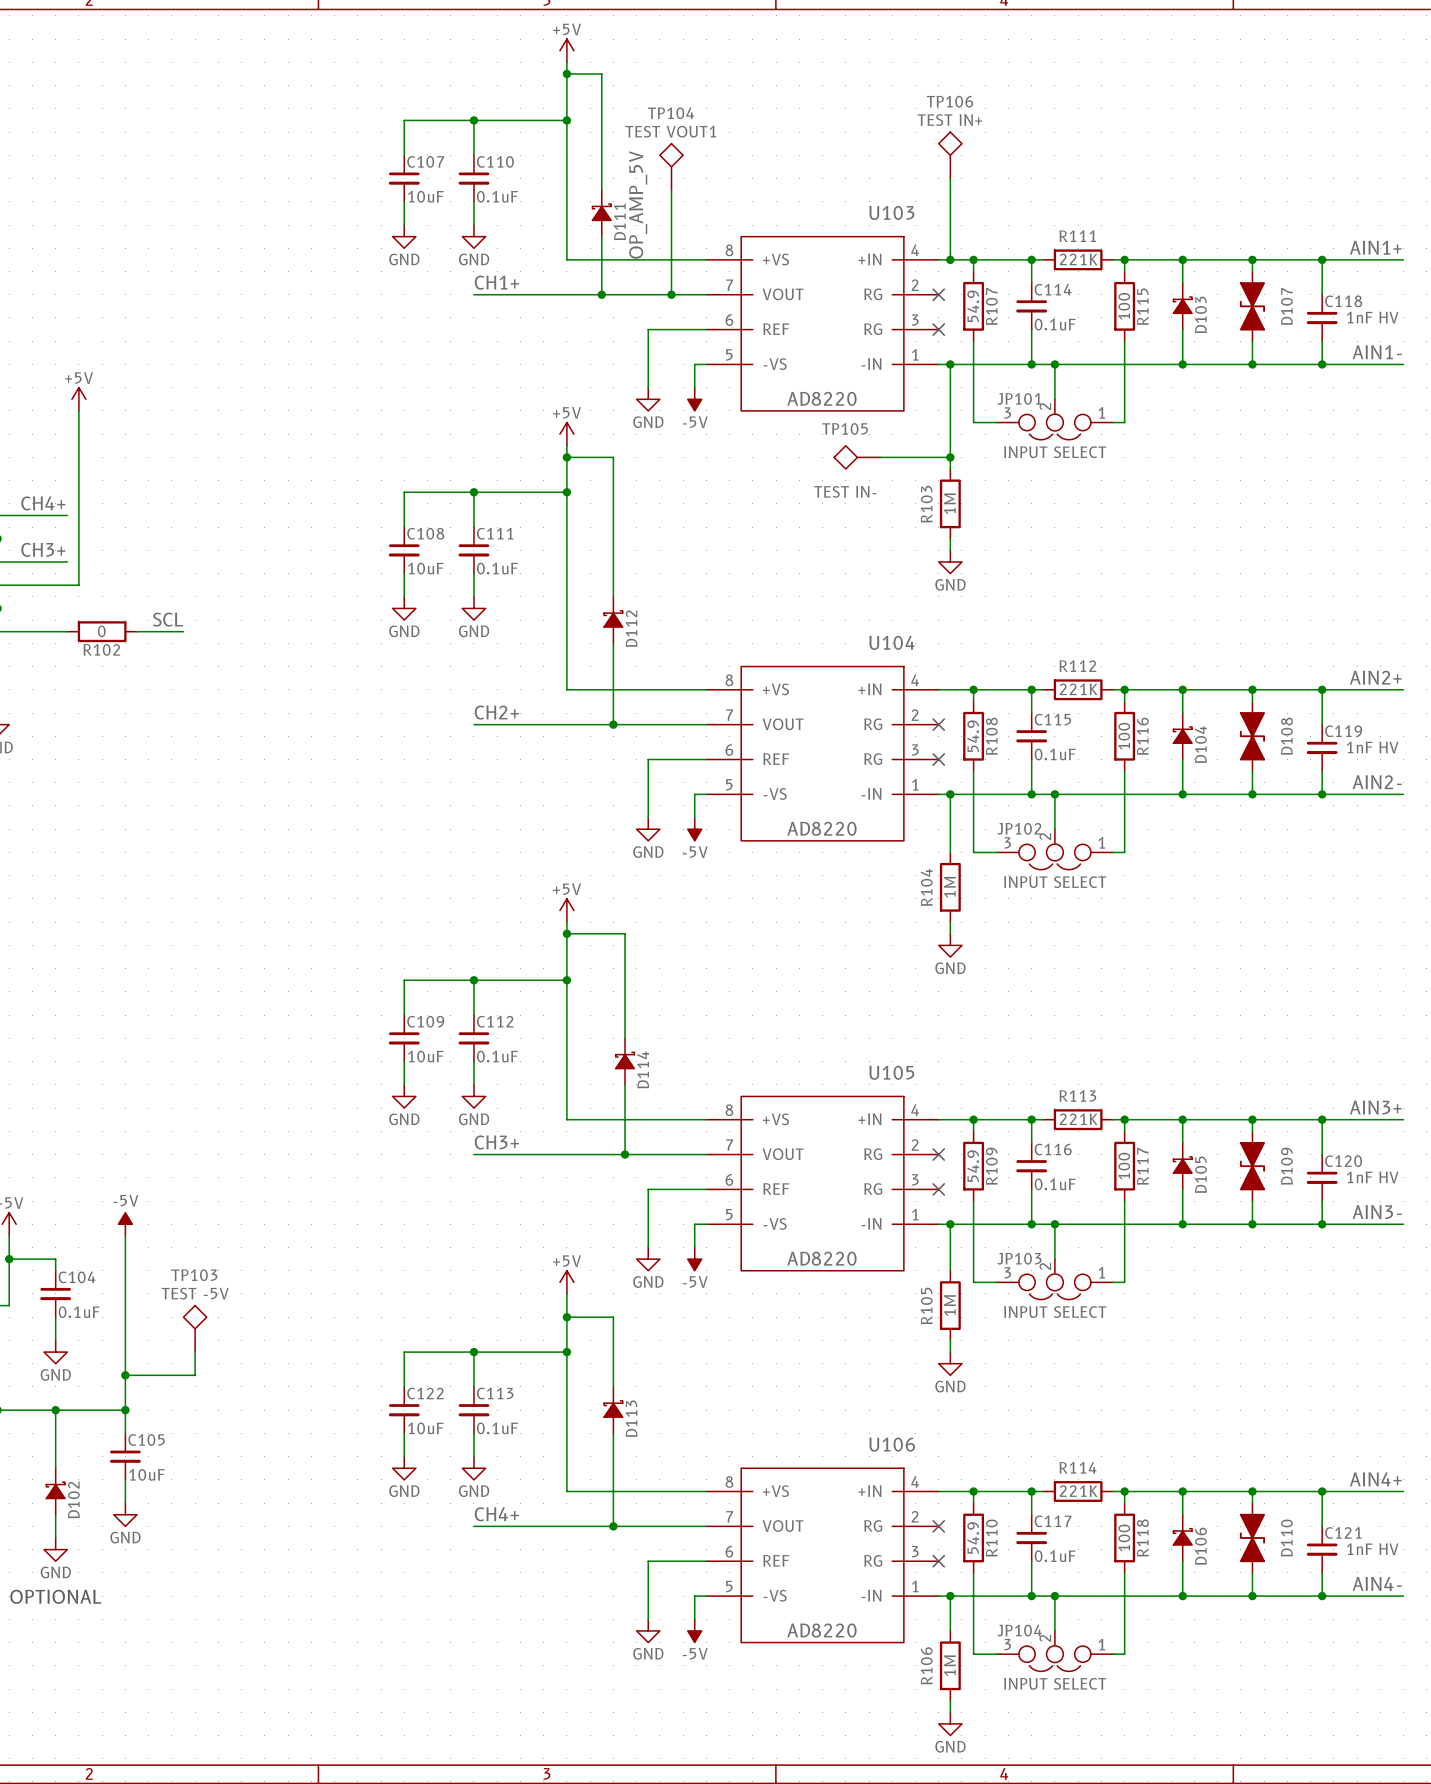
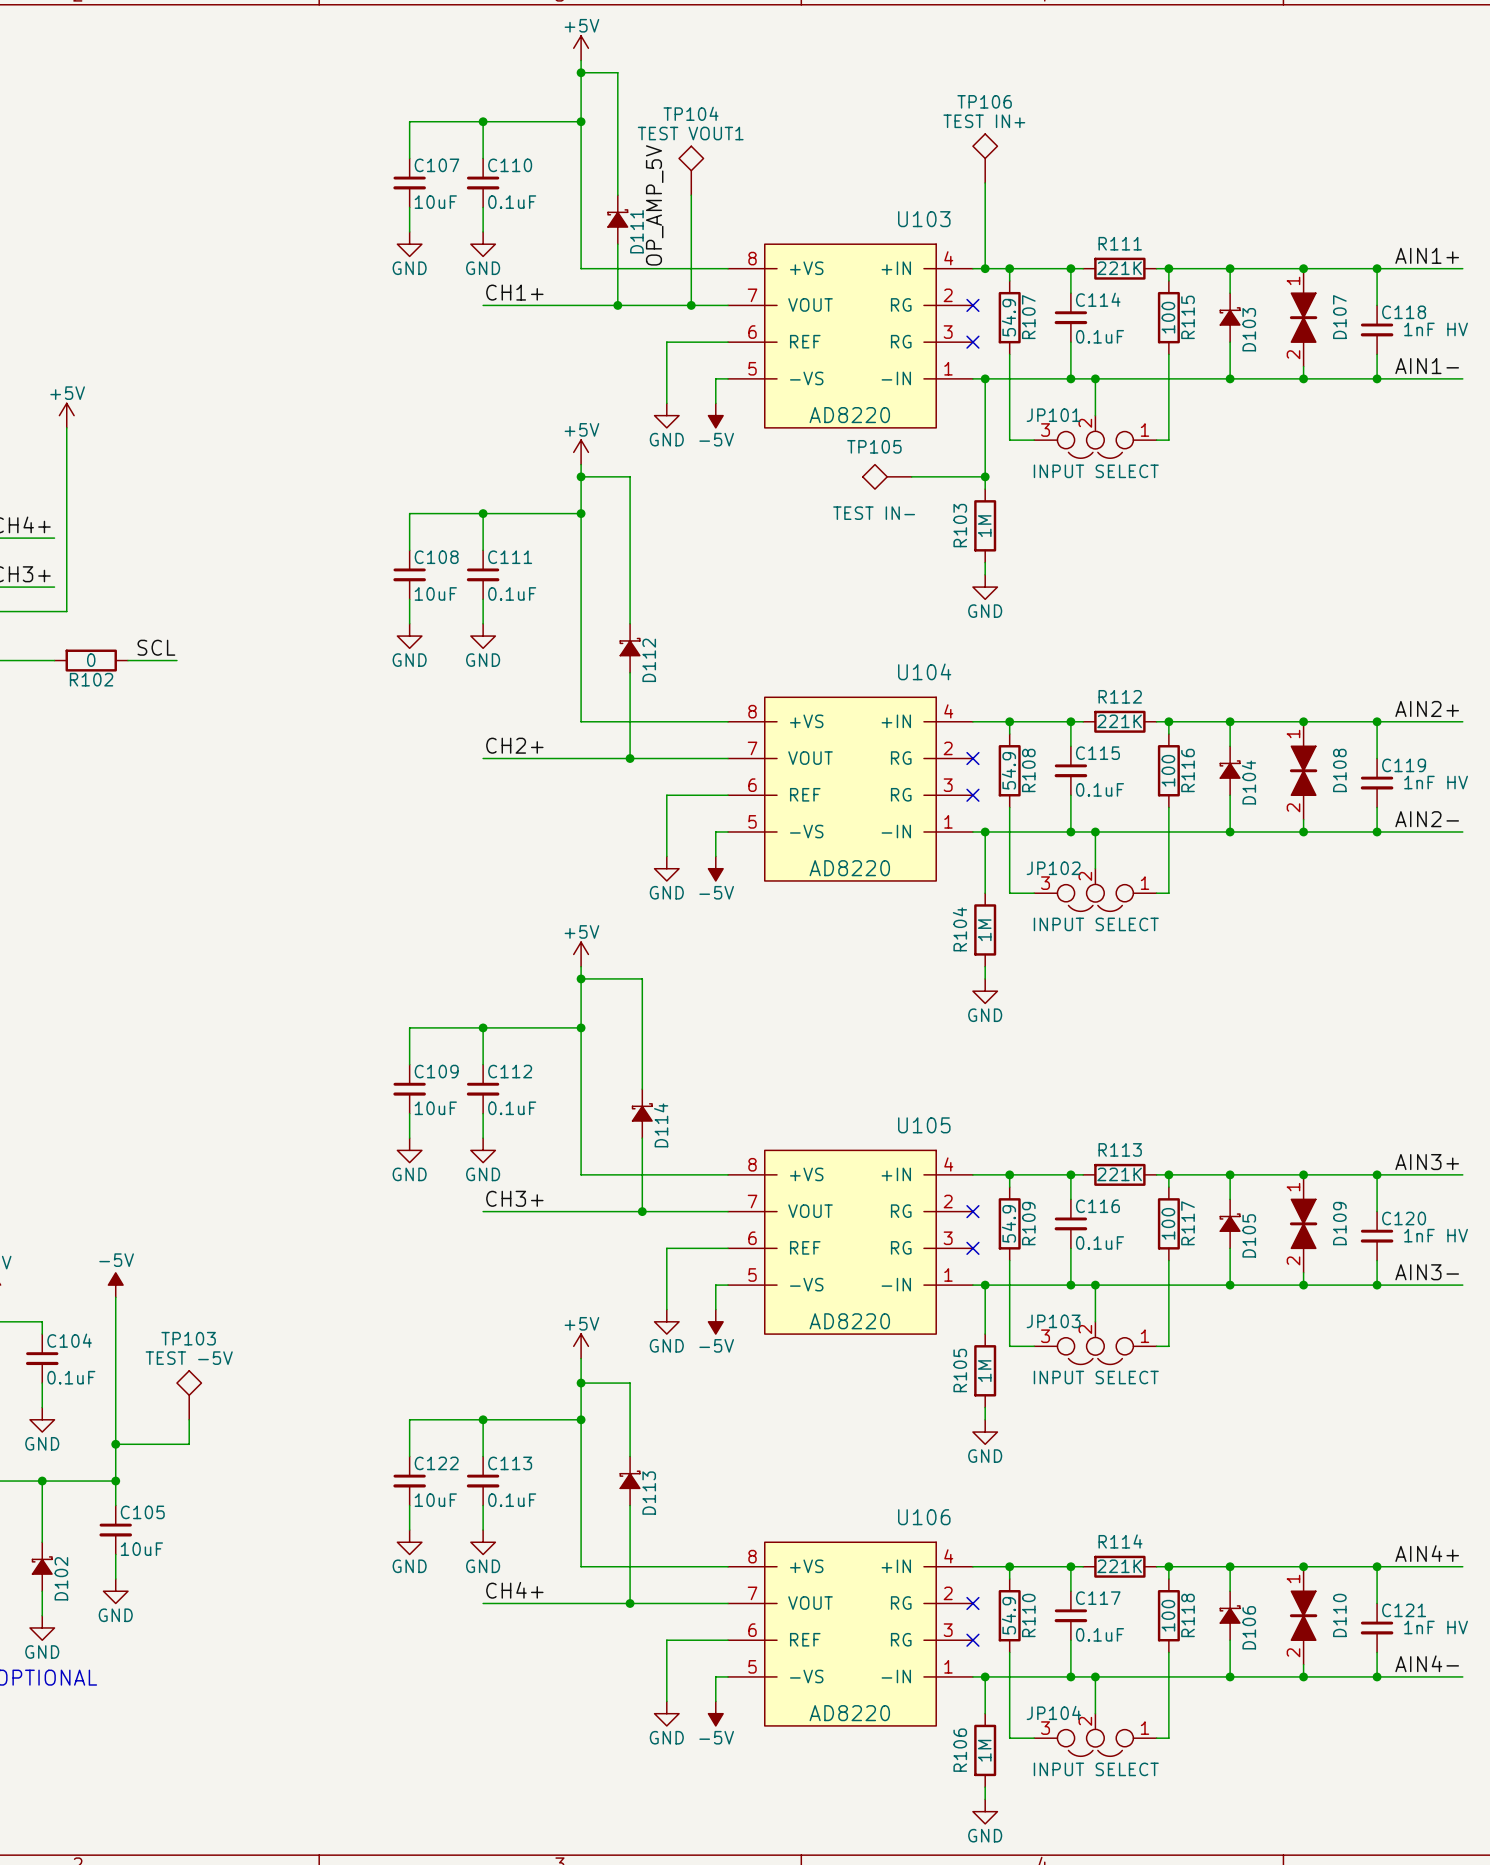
D107 symbol: [1239, 271, 1265, 342] -> [1289, 268, 1318, 367]
D108 symbol: [1239, 701, 1265, 772] -> [1289, 721, 1318, 820]
D109 symbol: [1239, 1131, 1265, 1202] -> [1289, 1174, 1318, 1273]
D110 symbol: [1239, 1503, 1265, 1573] -> [1289, 1566, 1318, 1665]

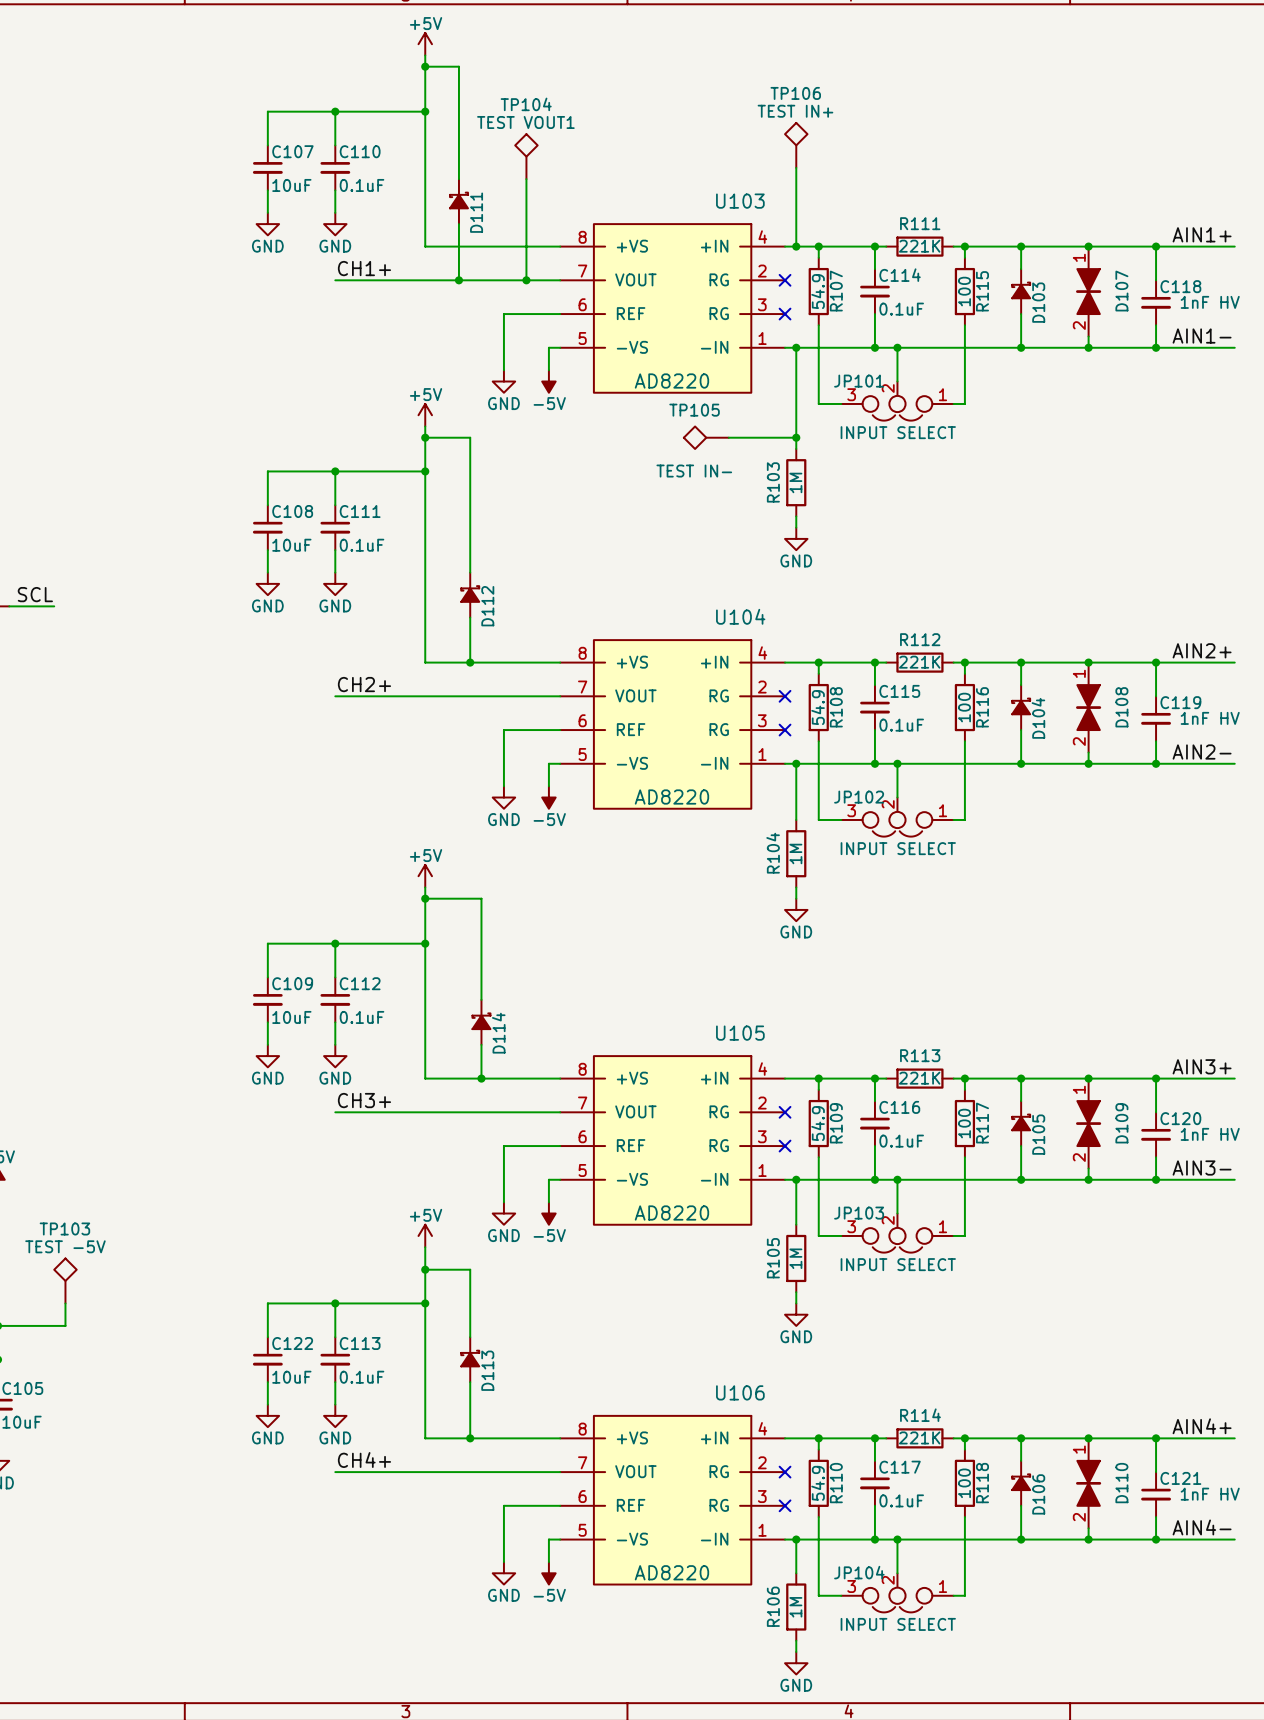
label: OP_AMP_5V (654, 205) -> none
wire: (630, 721) (630, 758) -> none
junction position: (630, 758) -> (470, 662)
wire: (642, 1174) (642, 1211) -> none
junction position: (642, 1211) -> (481, 1078)
wire: (630, 1566) (630, 1603) -> none
junction position: (630, 1603) -> (470, 1438)

